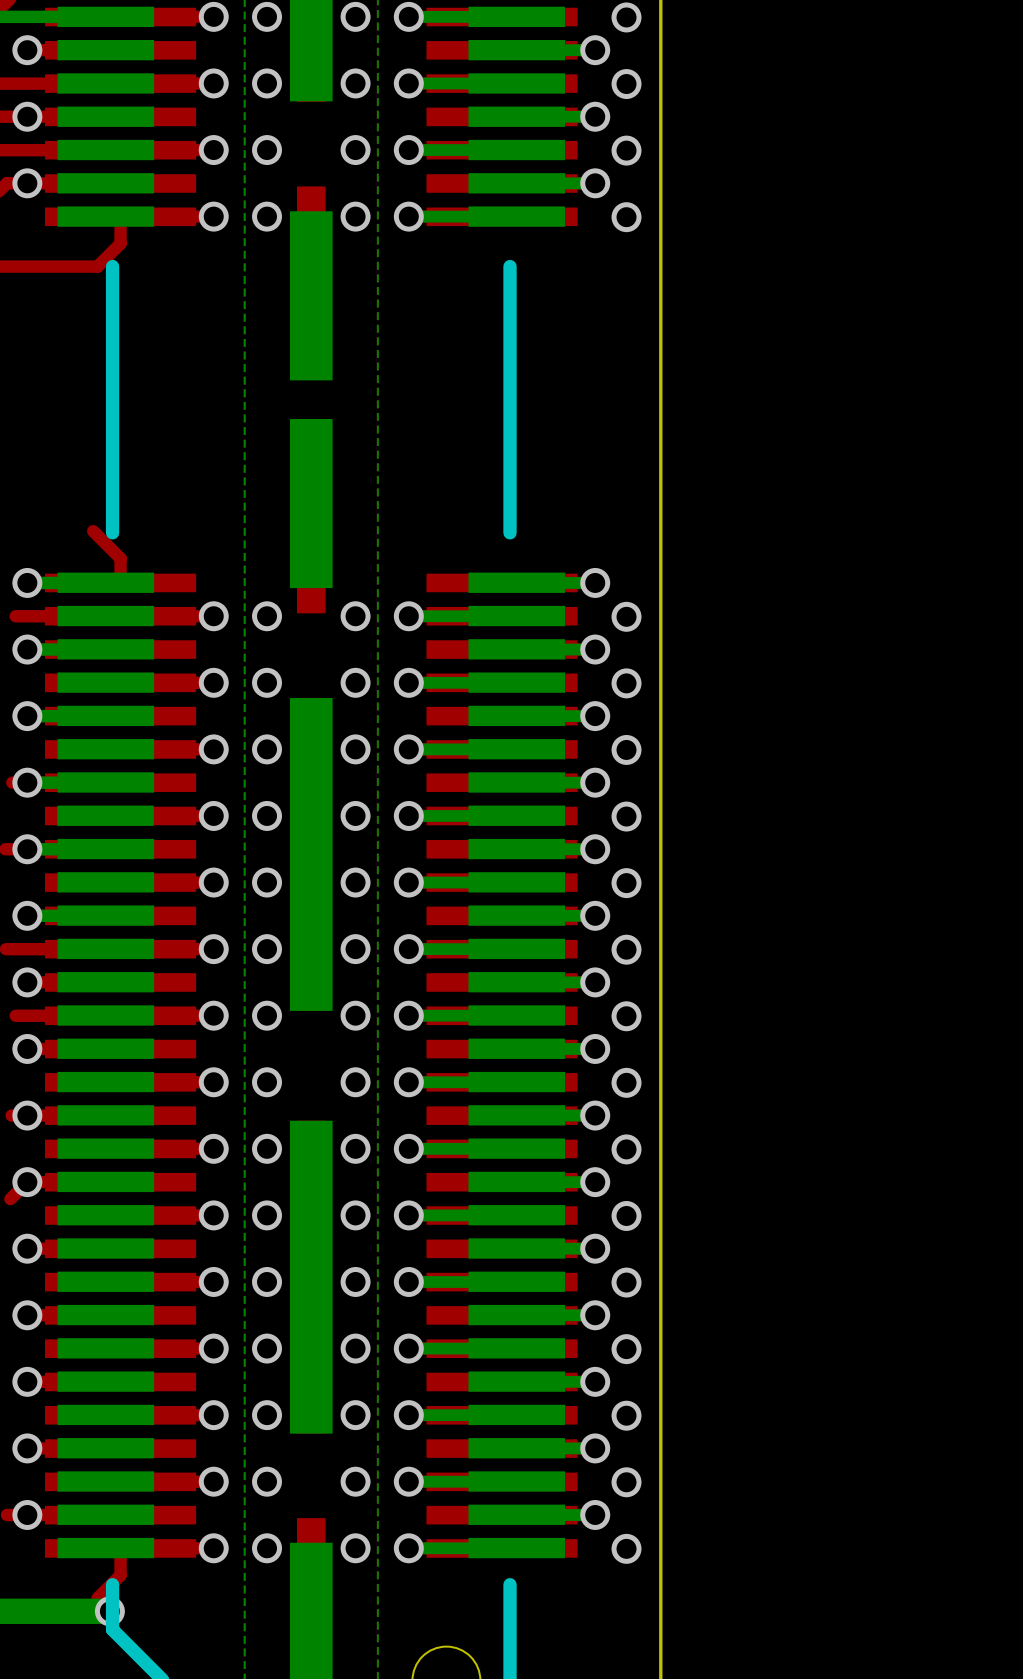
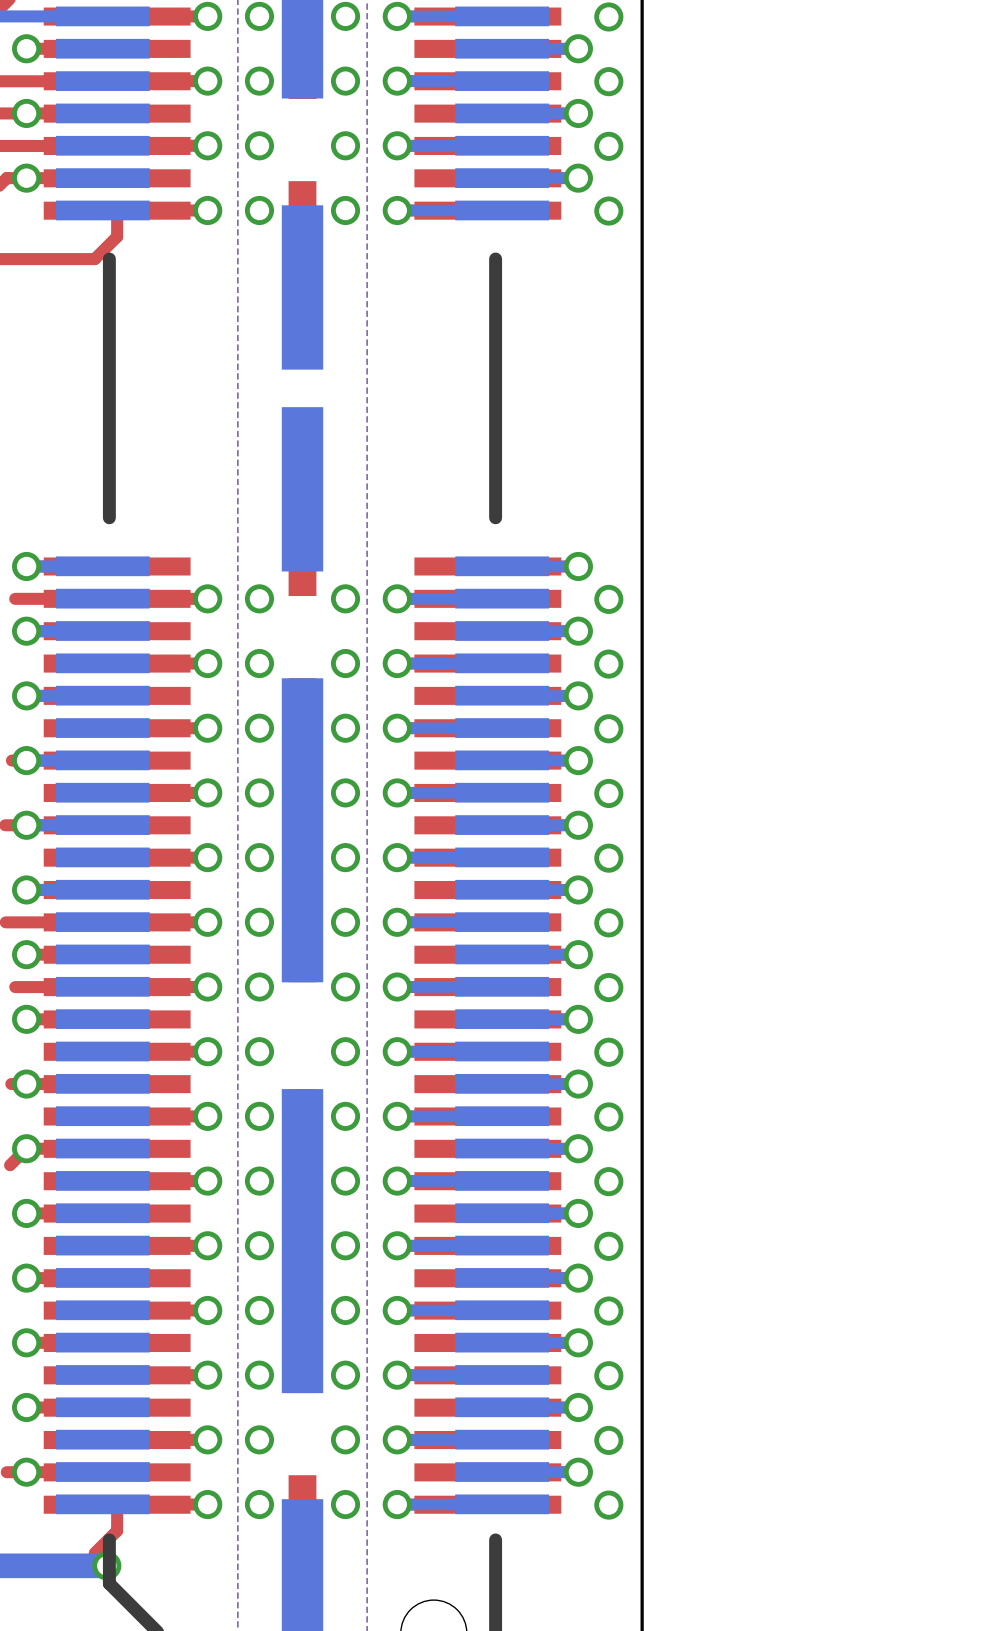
top track: (93, 531) (120, 558) (120, 582) -> none

